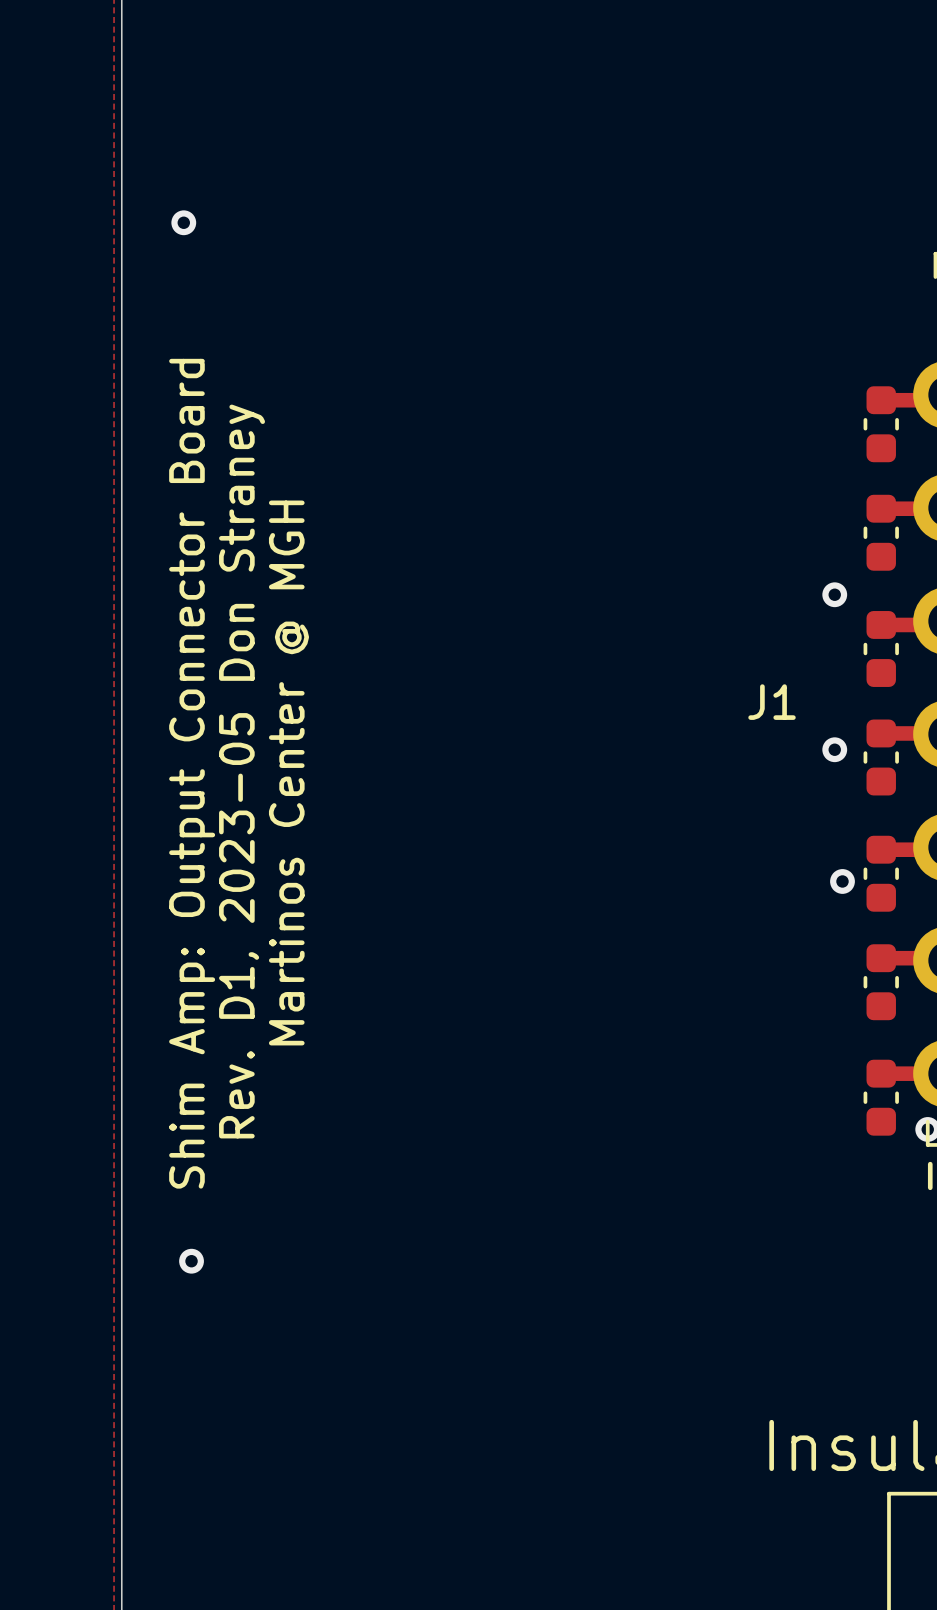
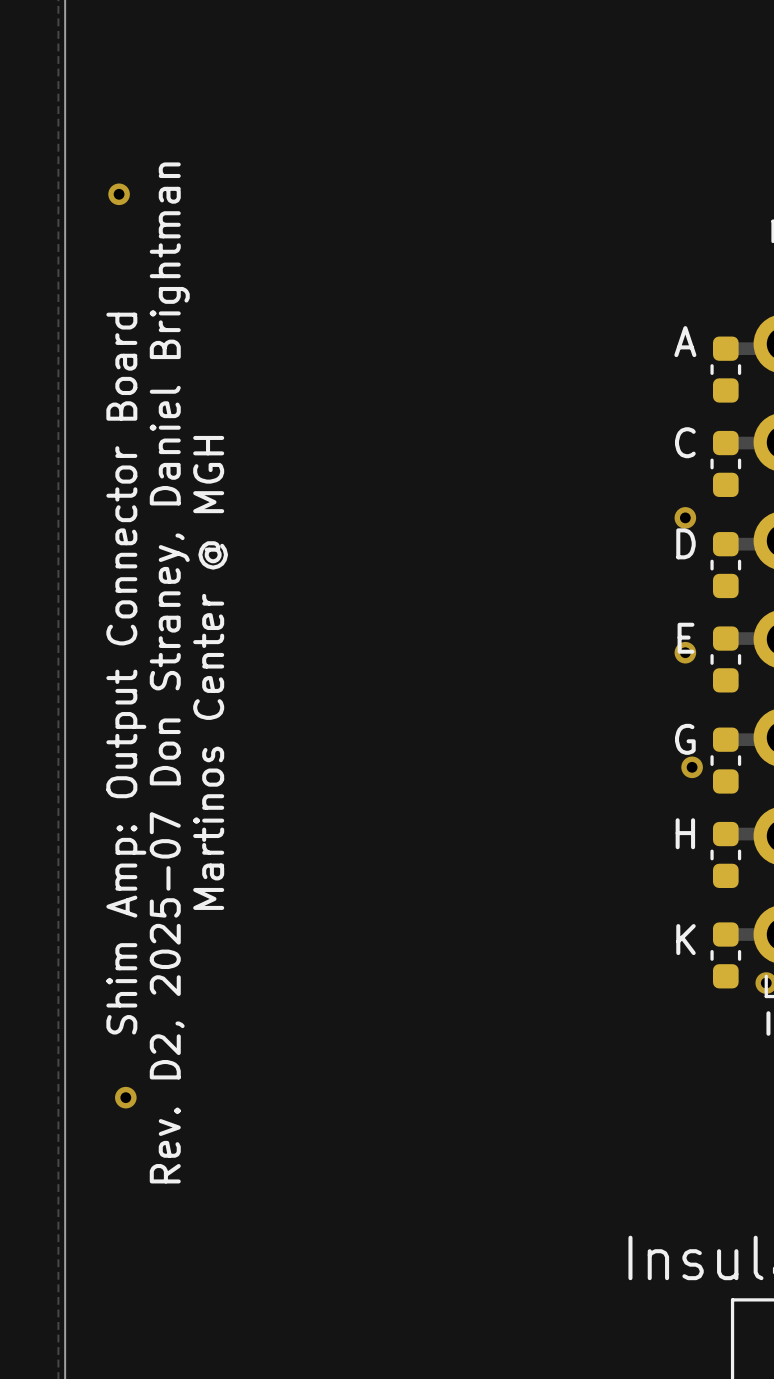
text: none -> A (685, 341)
text: none -> C (685, 442)
text: none -> D (686, 543)
J1 name: J1 (772, 702) -> none
text: none -> E (686, 638)
text: Rev. D1, 2023-05 Don Straney (242, 771) -> Rev. D2, 2025-07 Don Straney, Daniel Brightman (169, 672)
text: none -> G (685, 739)
text: none -> H (685, 833)
text: none -> K (686, 939)

